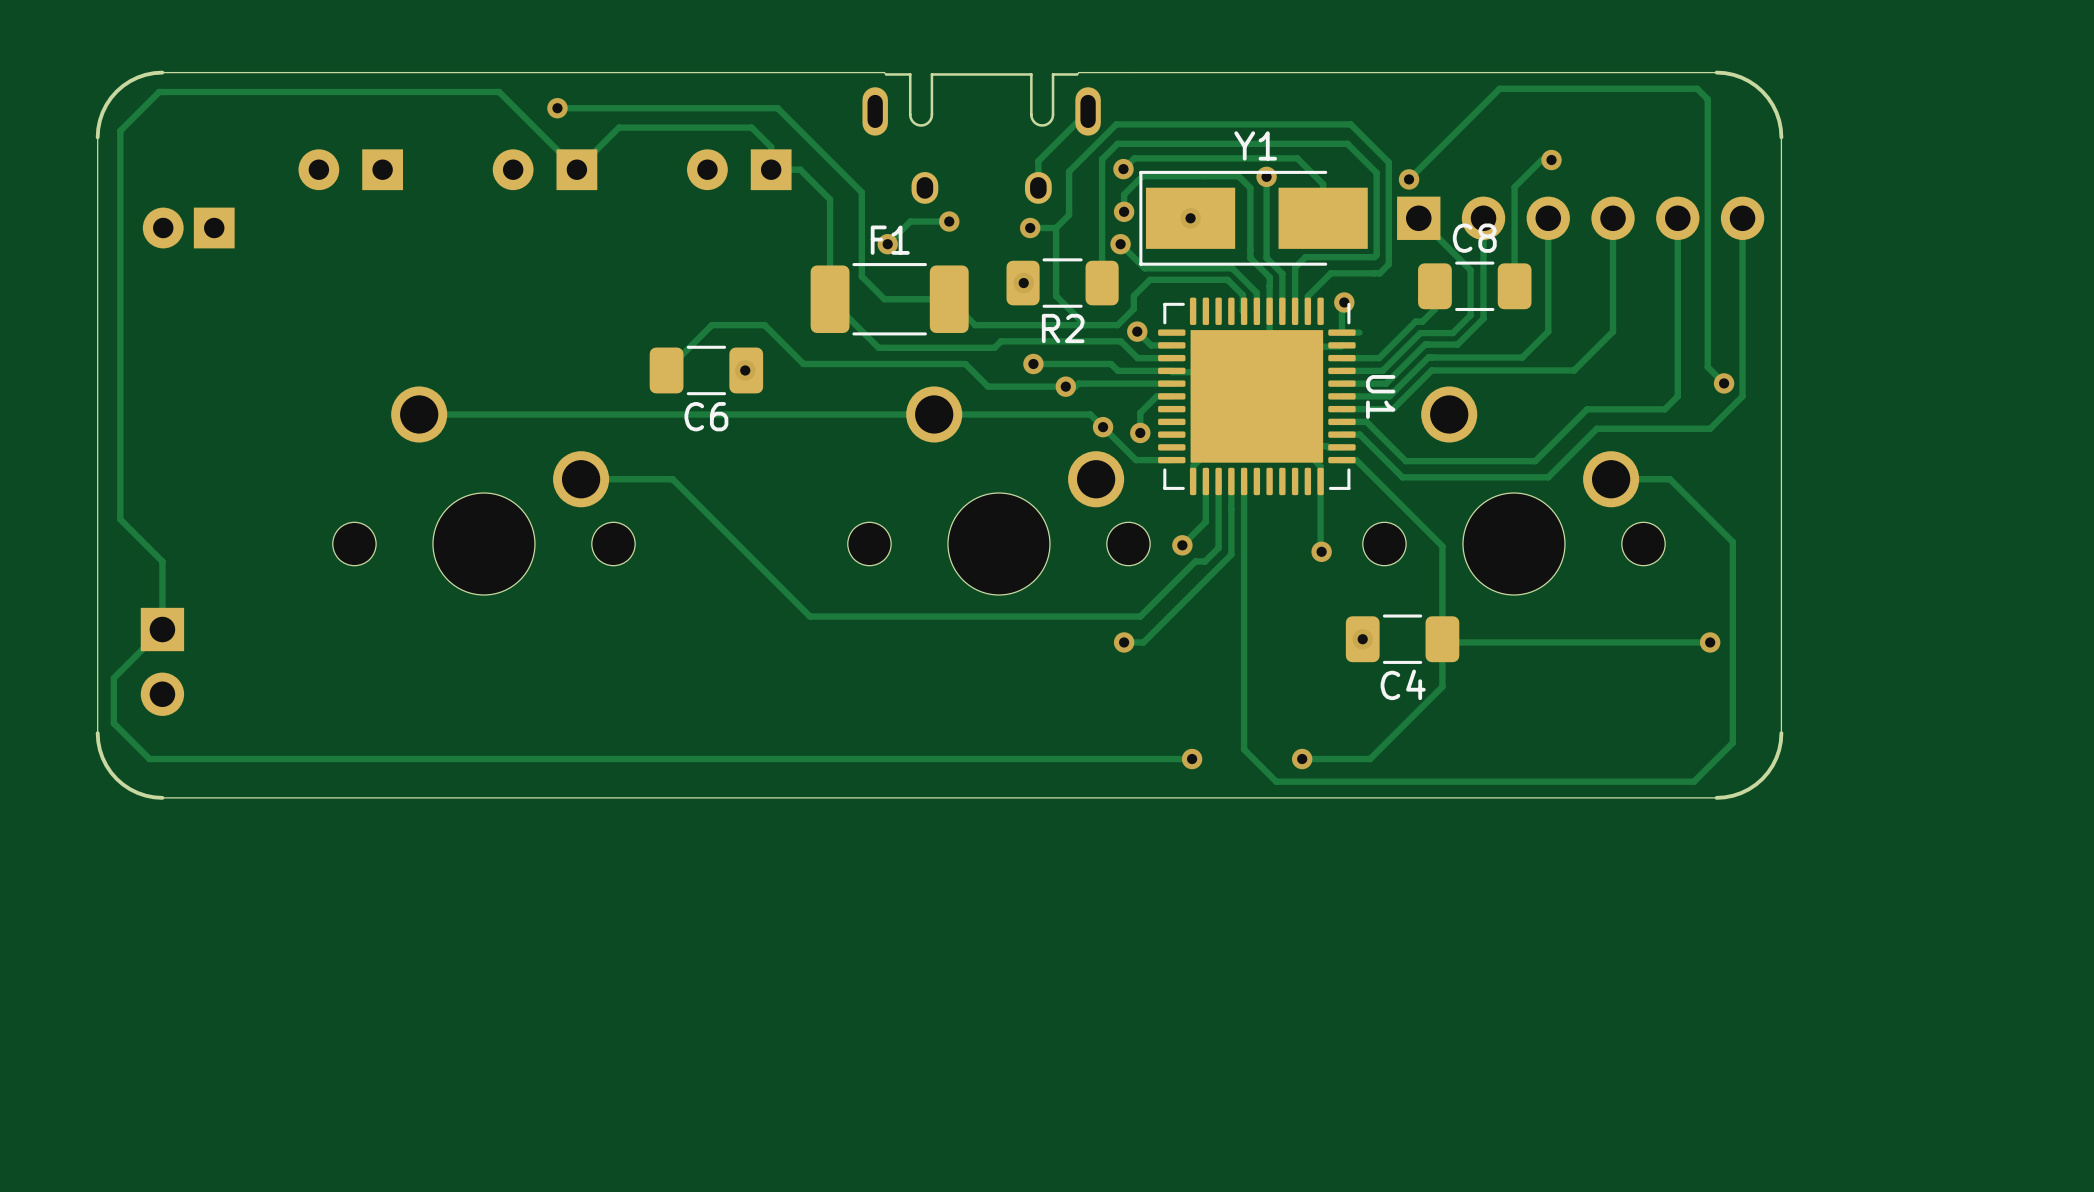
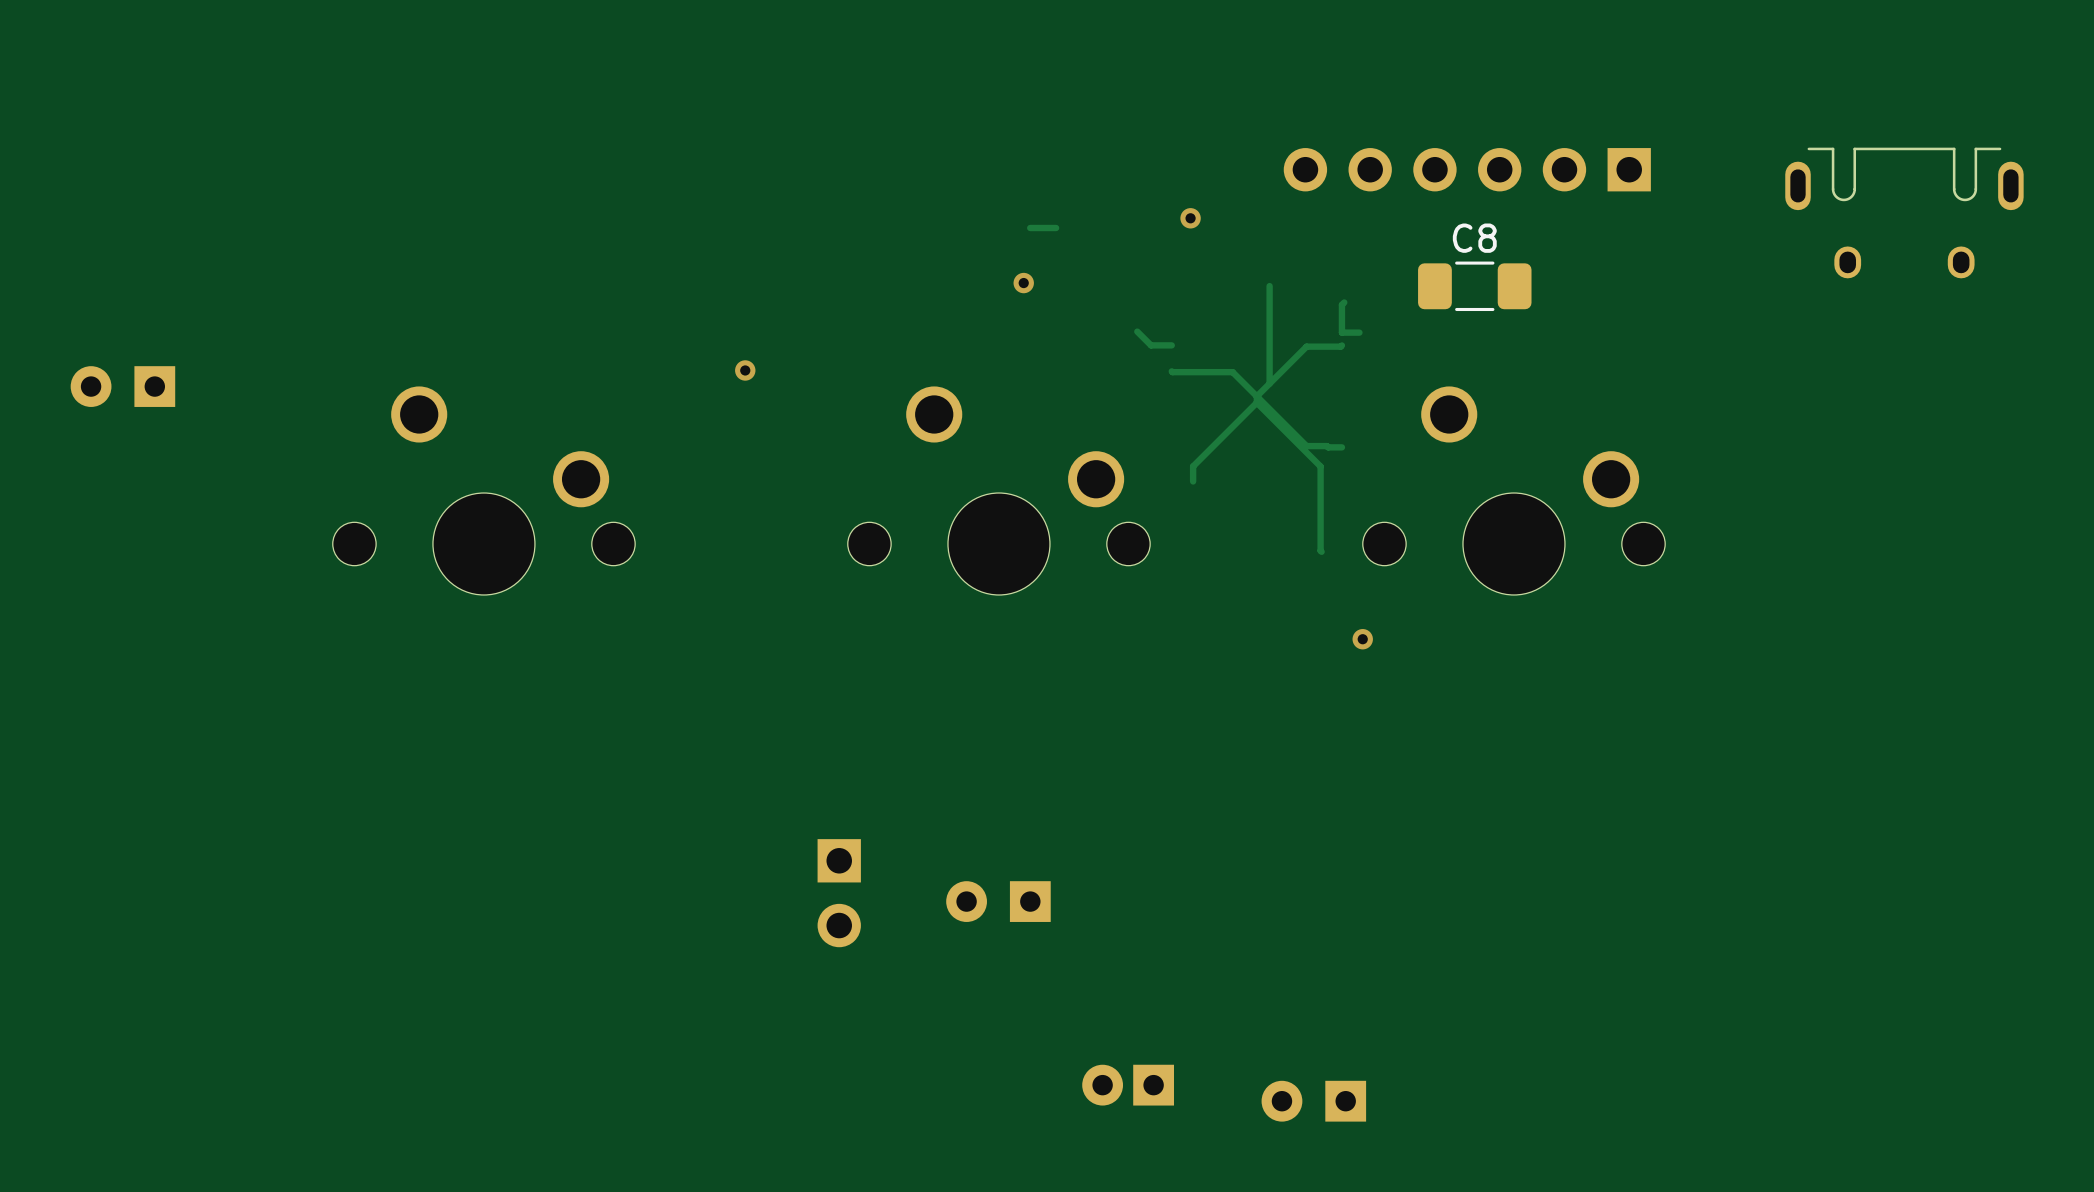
board edge: (1077, 74) (1078, 72) (1716, 72) (1741, 77) (1762, 91) (1776, 112) (1781, 137) (1781, 733) (1776, 757) (1762, 778) (1741, 792) (1716, 797) (162, 797) (137, 792) (116, 778) (102, 757) (97, 733) (97, 137) (102, 112) (116, 91) (137, 77) (162, 72) (884, 72) (886, 74) -> none
track: (557, 108) (777, 108) (861, 192) (861, 276) (884, 299) (949, 299) (975, 325) (1117, 325) (1133, 308) (1133, 296) (1150, 279) (1227, 279) (1242, 295) (1242, 311) -> none
via: (557, 108) -> none
track: (1088, 111) (1038, 161) (1038, 187) -> none
part: (981, 138) -> none
track: (1551, 160) (1541, 160) (1514, 187) (1514, 286) -> none
via: (1551, 160) -> none
part: (350, 169) -> none
part: (545, 169) -> none
part: (739, 169) -> none
track: (1123, 169) (1134, 158) (1297, 158) (1323, 184) (1323, 218) -> none
via: (1123, 169) -> none
track: (1266, 176) (1266, 257) (1282, 273) (1282, 311) -> none
via: (1266, 176) -> none
track: (1409, 179) (1499, 88) (1697, 88) (1707, 99) (1707, 367) (1724, 383) -> none
via: (1409, 179) -> none
track: (1124, 211) (1124, 194) (1142, 176) (1238, 176) (1250, 187) (1250, 258) (1269, 277) (1269, 285) -> none
via: (1124, 211) -> none
part: none -> (1904, 213)
Y1: (1253, 218) -> none
track: (1418, 218) (1470, 270) (1470, 315) (1452, 333) (1420, 333) (1382, 370) (1341, 370) -> none
track: (1483, 218) (1483, 318) (1457, 344) (1425, 344) (1386, 383) (1341, 383) -> none
track: (1548, 218) (1548, 331) (1522, 357) (1428, 357) (1389, 396) (1341, 396) -> none
part rotation: 0° (1580, 218) -> 180° (1467, 169)
track: (1613, 218) (1613, 331) (1574, 370) (1431, 370) (1393, 409) (1341, 409) -> none
track: (1677, 218) (1677, 396) (1664, 409) (1587, 409) (1535, 461) (1405, 461) (1366, 421) (1341, 421) -> none
track: (1742, 218) (1742, 396) (1710, 428) (1596, 428) (1548, 477) (1402, 477) (1359, 434) (1341, 434) -> none
track: (949, 221) (910, 221) (887, 244) -> none
via: (949, 221) -> none
part: (188, 228) -> none
via: (1030, 228) -> none
via: (887, 244) -> none
track: (1120, 244) (1144, 268) (1232, 268) (1256, 292) (1256, 311) -> none
via: (1120, 244) -> none
R2: (1062, 283) -> none
track: (1102, 283) (1102, 159) (1117, 143) (1347, 143) (1376, 172) (1376, 254) (1374, 257) (1305, 257) (1295, 267) (1295, 311) -> none
track: (1434, 286) (1434, 309) (1422, 321) (1415, 321) (1379, 358) (1341, 358) -> none
F1: (889, 299) -> none
via: (1344, 302) -> none
track: (1307, 311) (1307, 296) (1330, 273) (1379, 273) (1388, 264) (1388, 162) (1350, 124) (1116, 124) (1069, 171) (1069, 215) (1056, 228) (1056, 296) (1085, 325) -> none
via: (1137, 331) -> none
track: (1171, 358) (1137, 358) (1120, 341) (1001, 341) (994, 347) (878, 347) (830, 299) (830, 199) (800, 169) (771, 169) (771, 147) (751, 127) (618, 127) (576, 169) (499, 92) (159, 92) (120, 130) (120, 519) (162, 561) (162, 629) (113, 678) (113, 723) (149, 759) (1192, 759) -> none
track: (1033, 364) (1111, 364) (1118, 370) (1171, 370) -> none
via: (1033, 364) -> none
track: (666, 370) (711, 325) (764, 325) (803, 364) (965, 364) (988, 386) (1075, 386) (1078, 383) (1171, 383) -> none
C6: (706, 370) -> none
via: (1724, 383) -> none
part: none -> (122, 386)
via: (1065, 386) -> none
track: (1171, 396) (1156, 396) (1140, 412) (1140, 432) -> none
U1: (1256, 396) -> none
track: (419, 414) (1090, 414) (1136, 460) (1171, 460) -> none
via: (1103, 427) -> none
via: (1140, 432) -> none
track: (1341, 460) (1356, 460) (1442, 546) (1442, 686) (1370, 759) (1302, 759) -> none
track: (581, 479) (672, 479) (810, 616) (1140, 616) (1195, 561) (1205, 561) (1218, 547) (1218, 481) -> none
track: (1611, 479) (1669, 479) (1732, 542) (1732, 742) (1693, 781) (1276, 781) (1244, 749) (1244, 481) -> none
track: (1205, 481) (1205, 521) (1182, 545) -> none
track: (1231, 481) (1231, 554) (1143, 642) (1124, 642) -> none
via: (1182, 545) -> none
via: (1321, 551) -> none
C4: (1402, 639) -> none
track: (1442, 639) (1445, 642) (1710, 642) -> none
via: (1124, 642) -> none
via: (1710, 642) -> none
part: (162, 661) -> none
via: (1192, 759) -> none
via: (1302, 759) -> none
part: none -> (839, 893)
part: none -> (998, 901)
part: none -> (1128, 1085)
part: none -> (1313, 1101)

